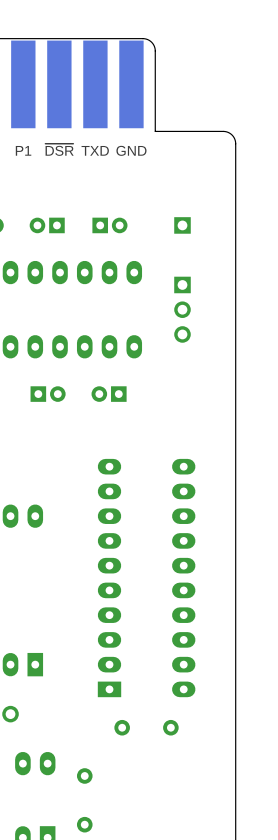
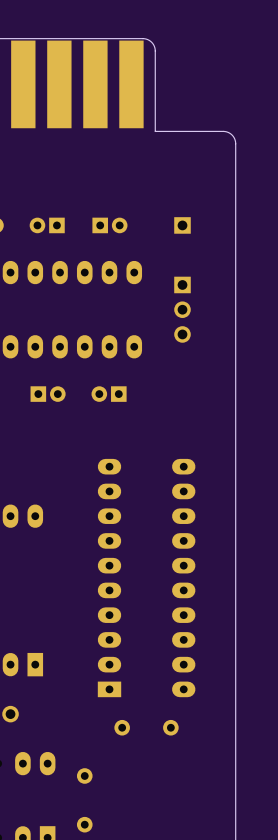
text: ~{DSR} (59, 149) -> none
text: P1 (23, 150) -> none
text: TXD (95, 150) -> none
text: GND (131, 150) -> none

